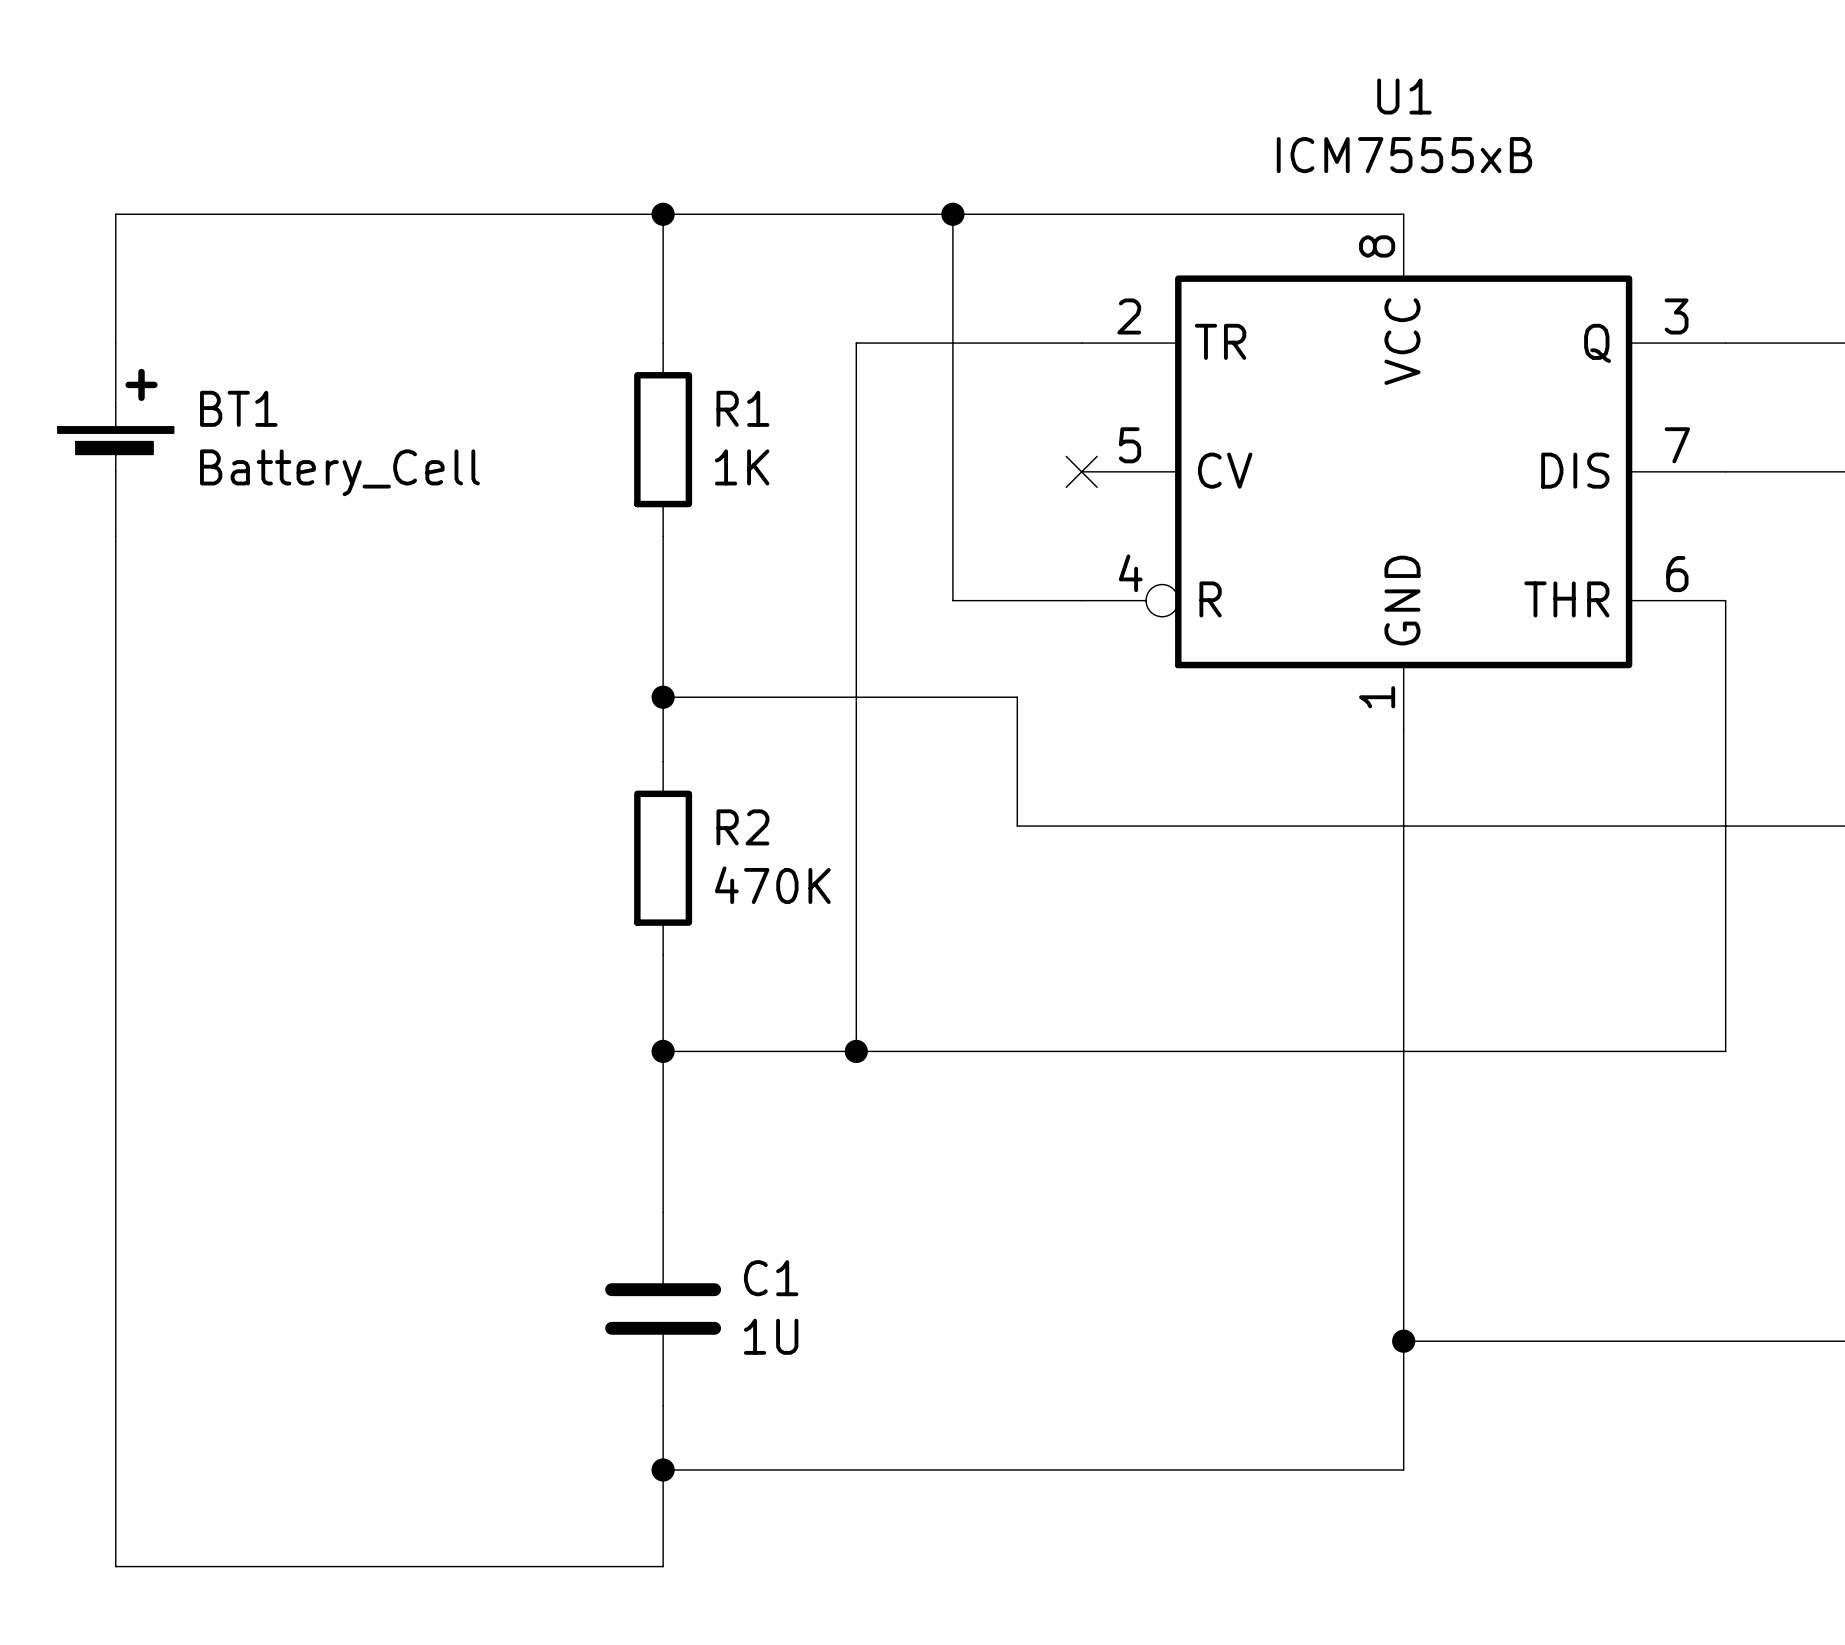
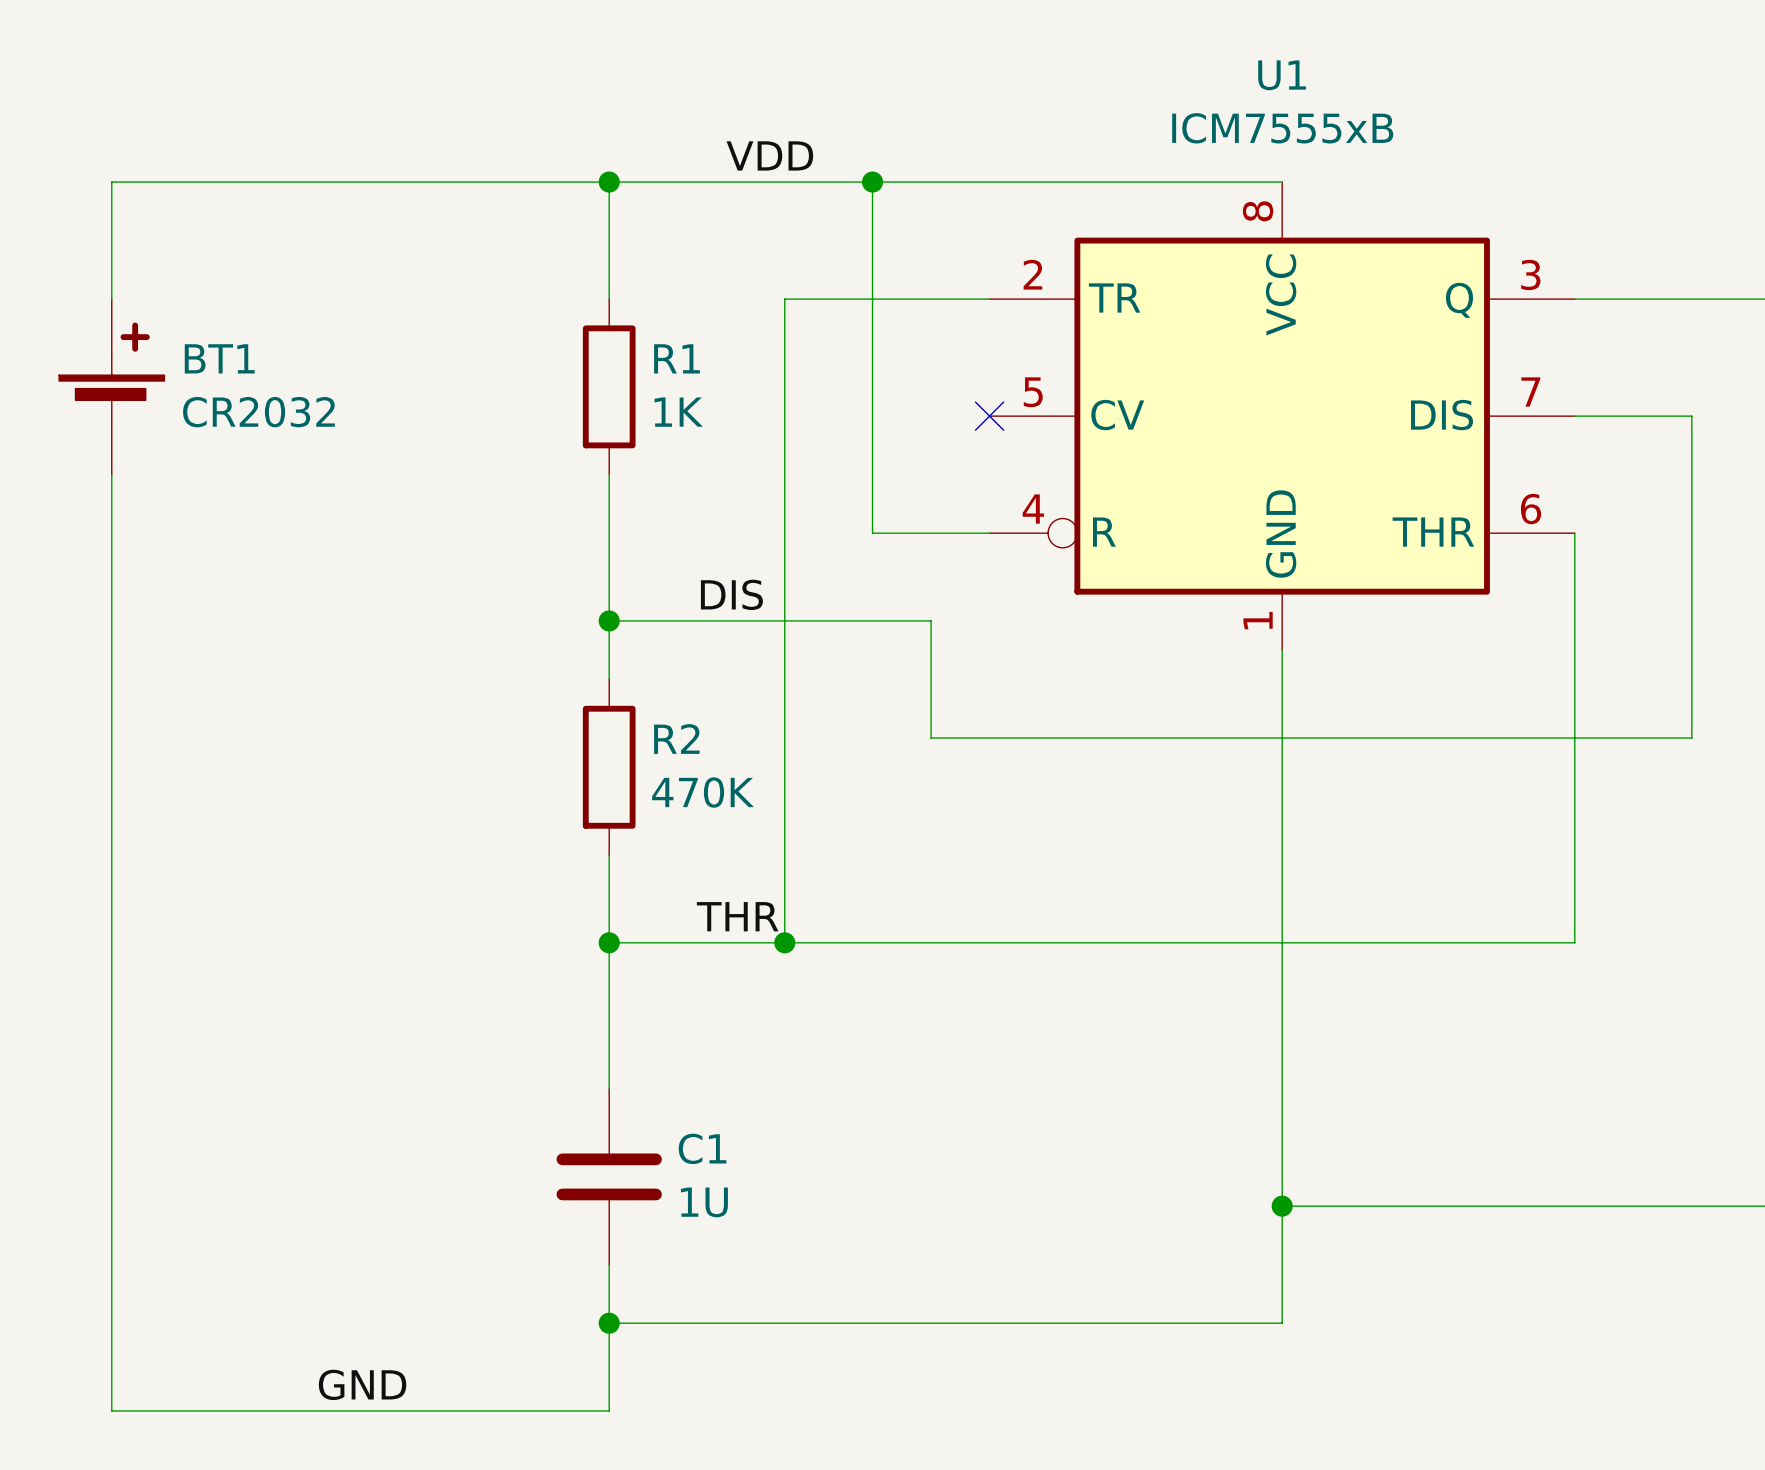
label: none -> VDD (769, 155)
BT1 value: Battery_Cell (339, 472) -> CR2032 (258, 412)
label: none -> DIS (731, 594)
label: none -> THR (737, 916)
label: none -> GND (362, 1384)

